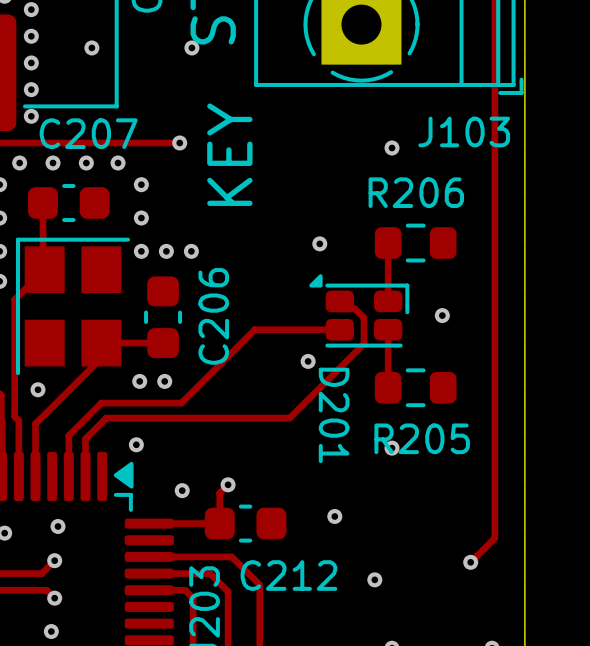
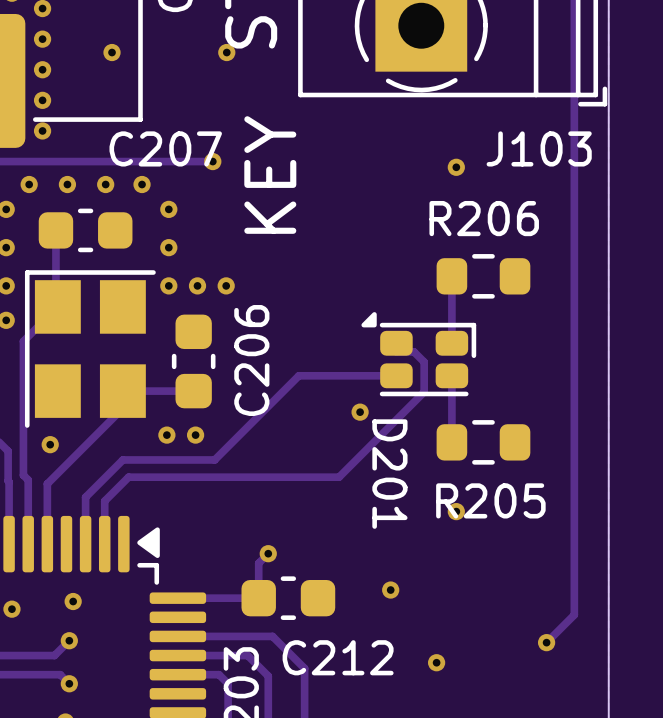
C207 name position: C207 (88, 133) -> C207 (165, 148)
via: (319, 243) -> none
via: (442, 315) -> none
via: (136, 444) -> none
via: (182, 490) -> none

